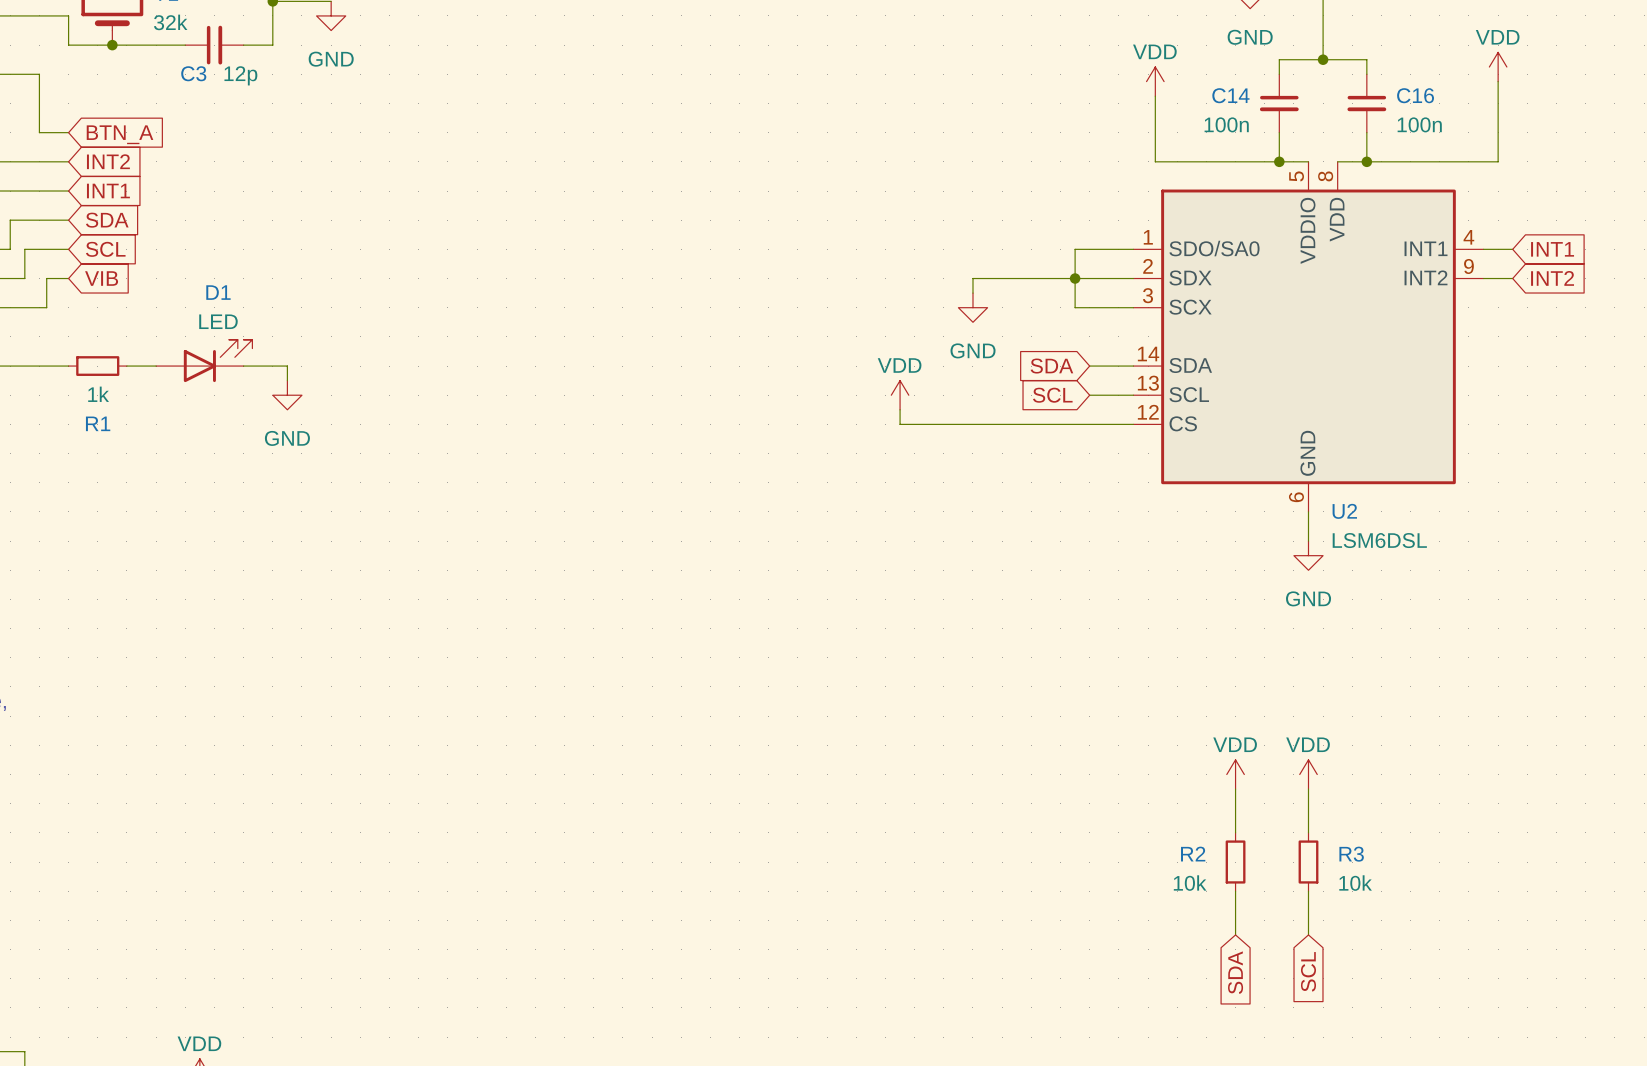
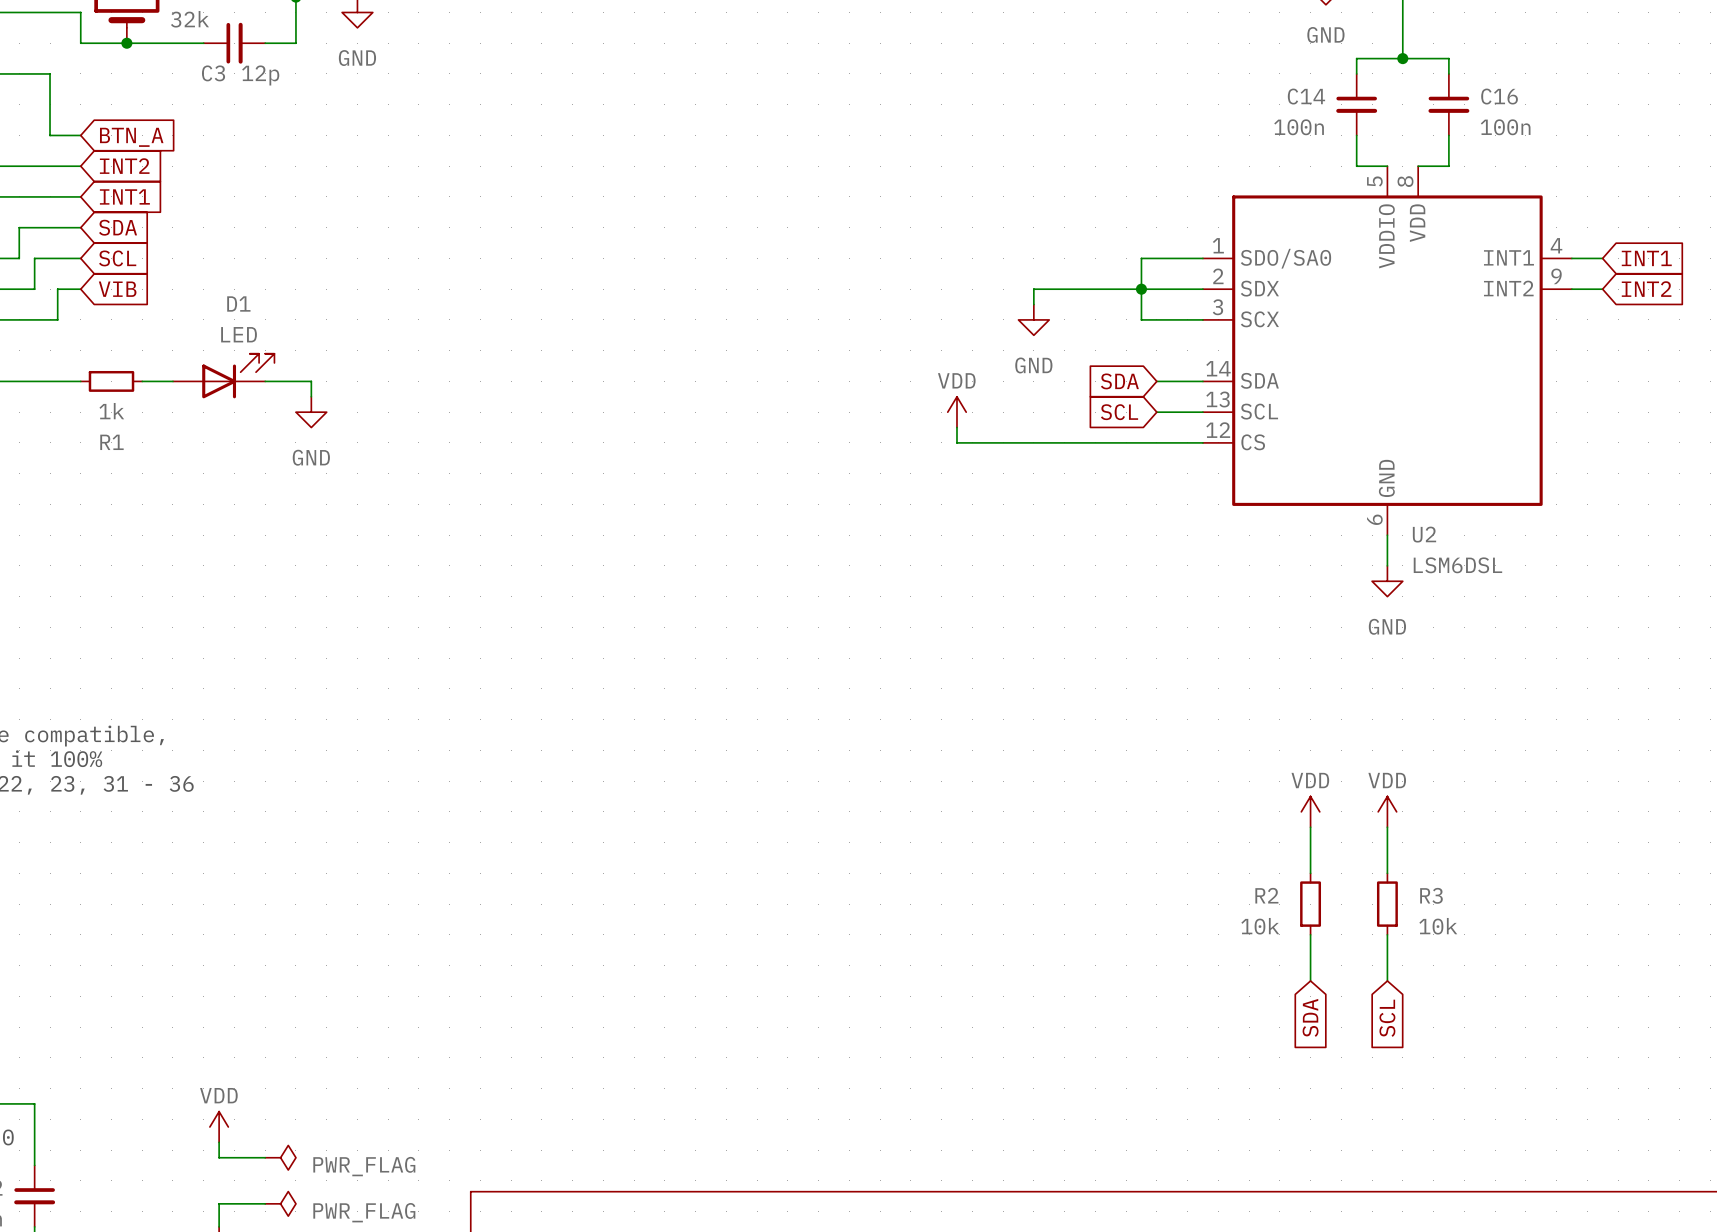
power symbol: VDD (1498, 67) -> none
power symbol: VDD (1155, 81) -> none
wire: (1498, 81) (1498, 161) (1366, 161) -> none
wire: (1155, 96) (1155, 161) (1279, 161) -> none
junction: (1279, 161) -> none
junction: (1366, 161) -> none

